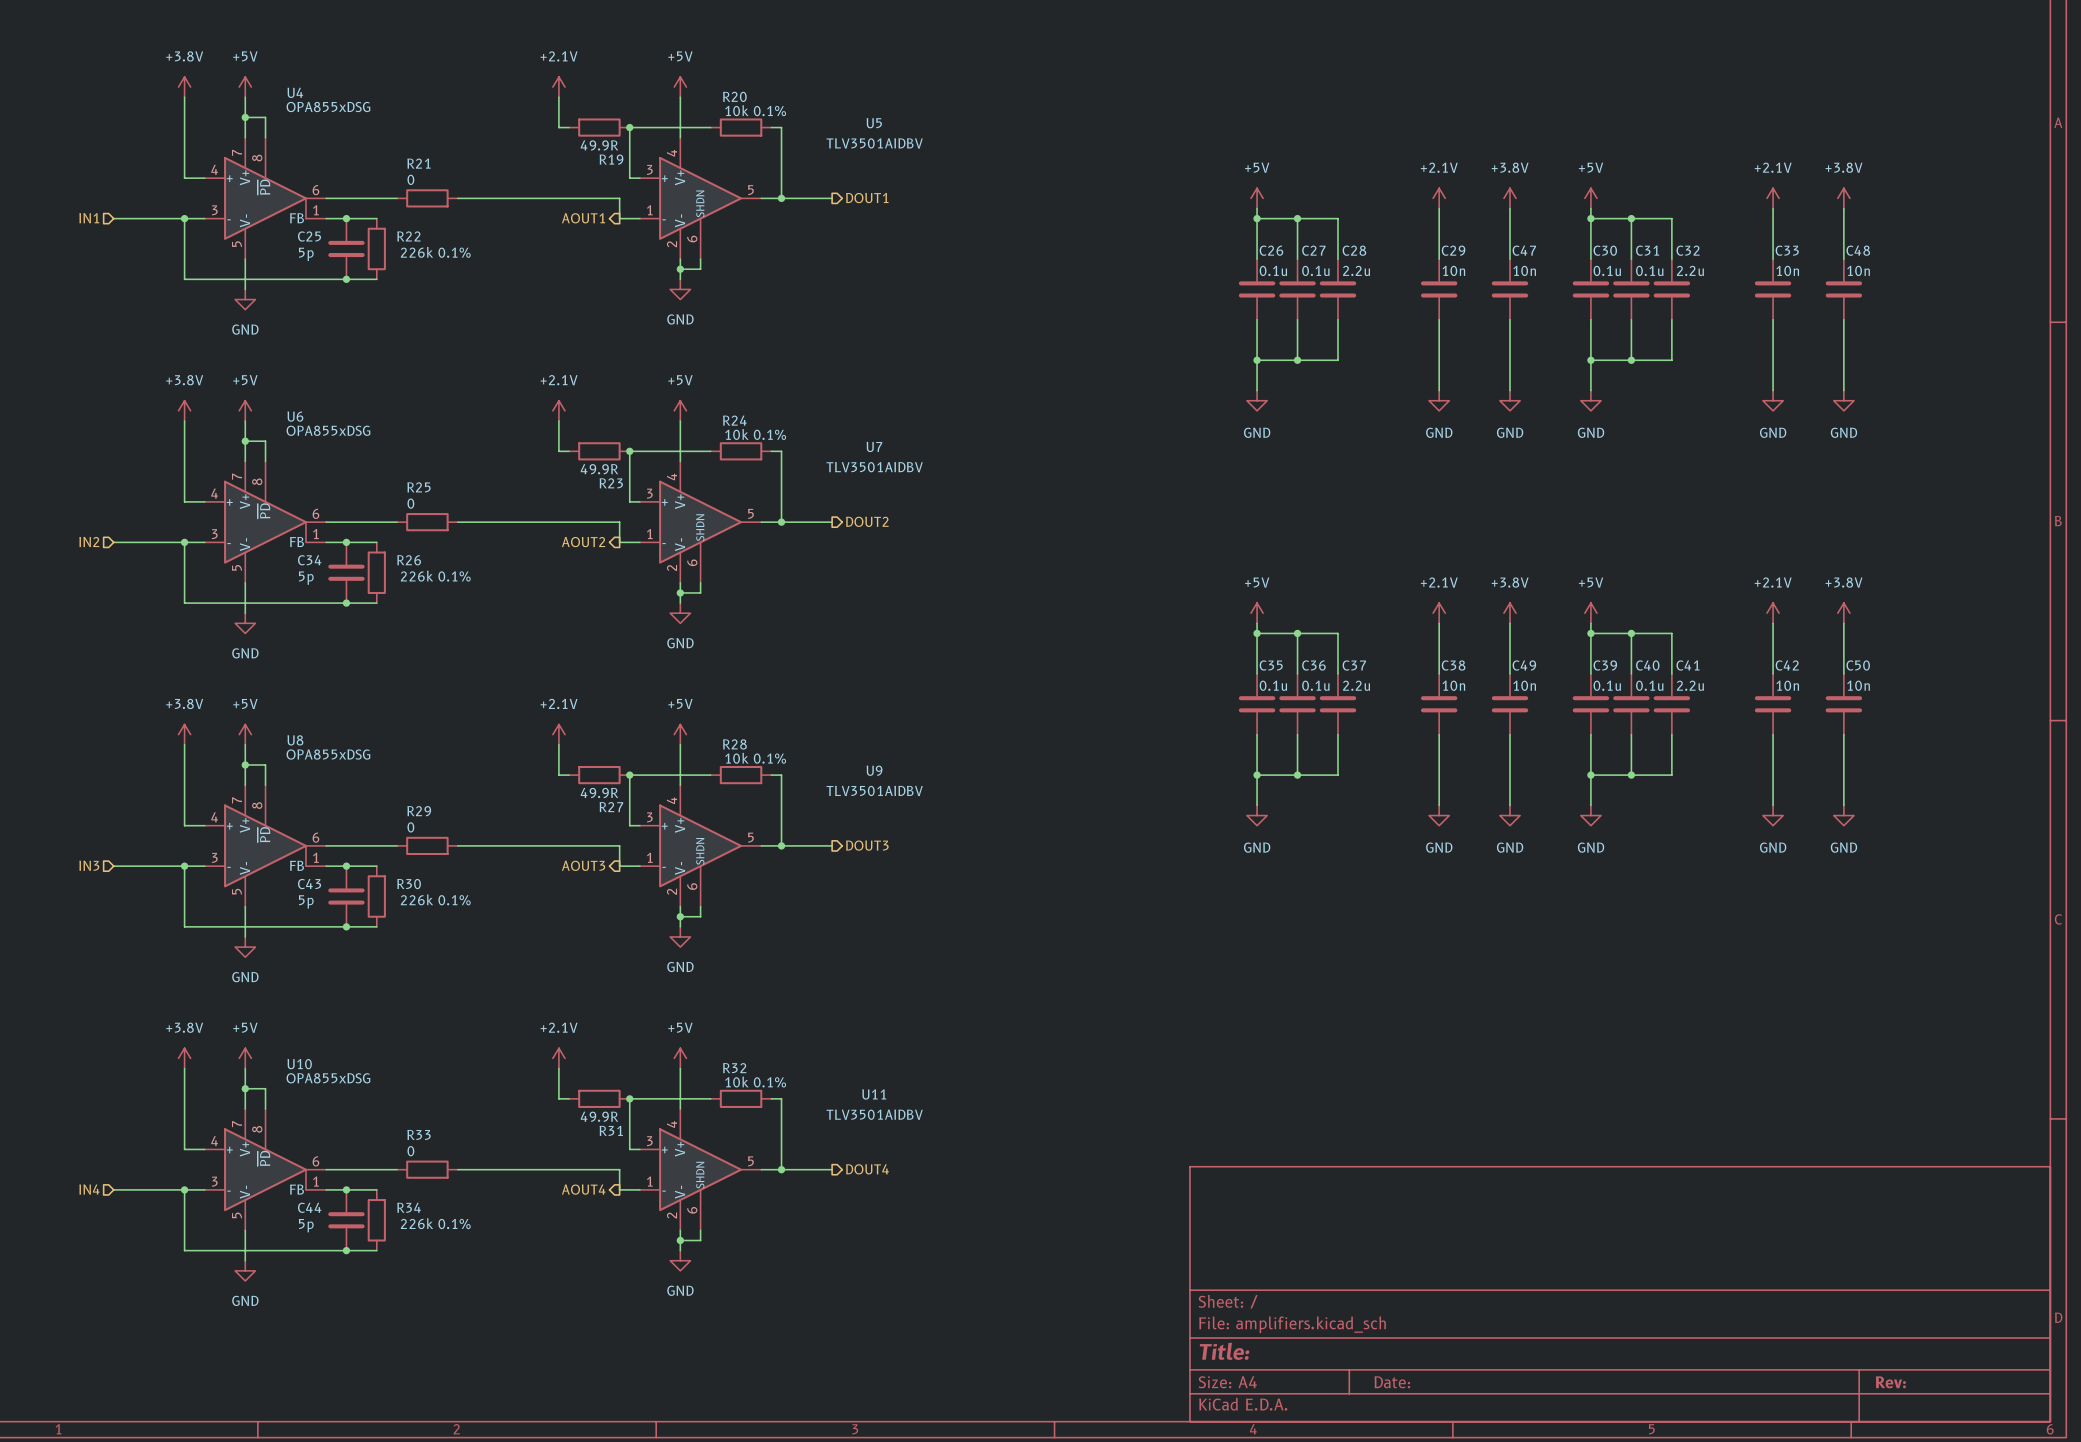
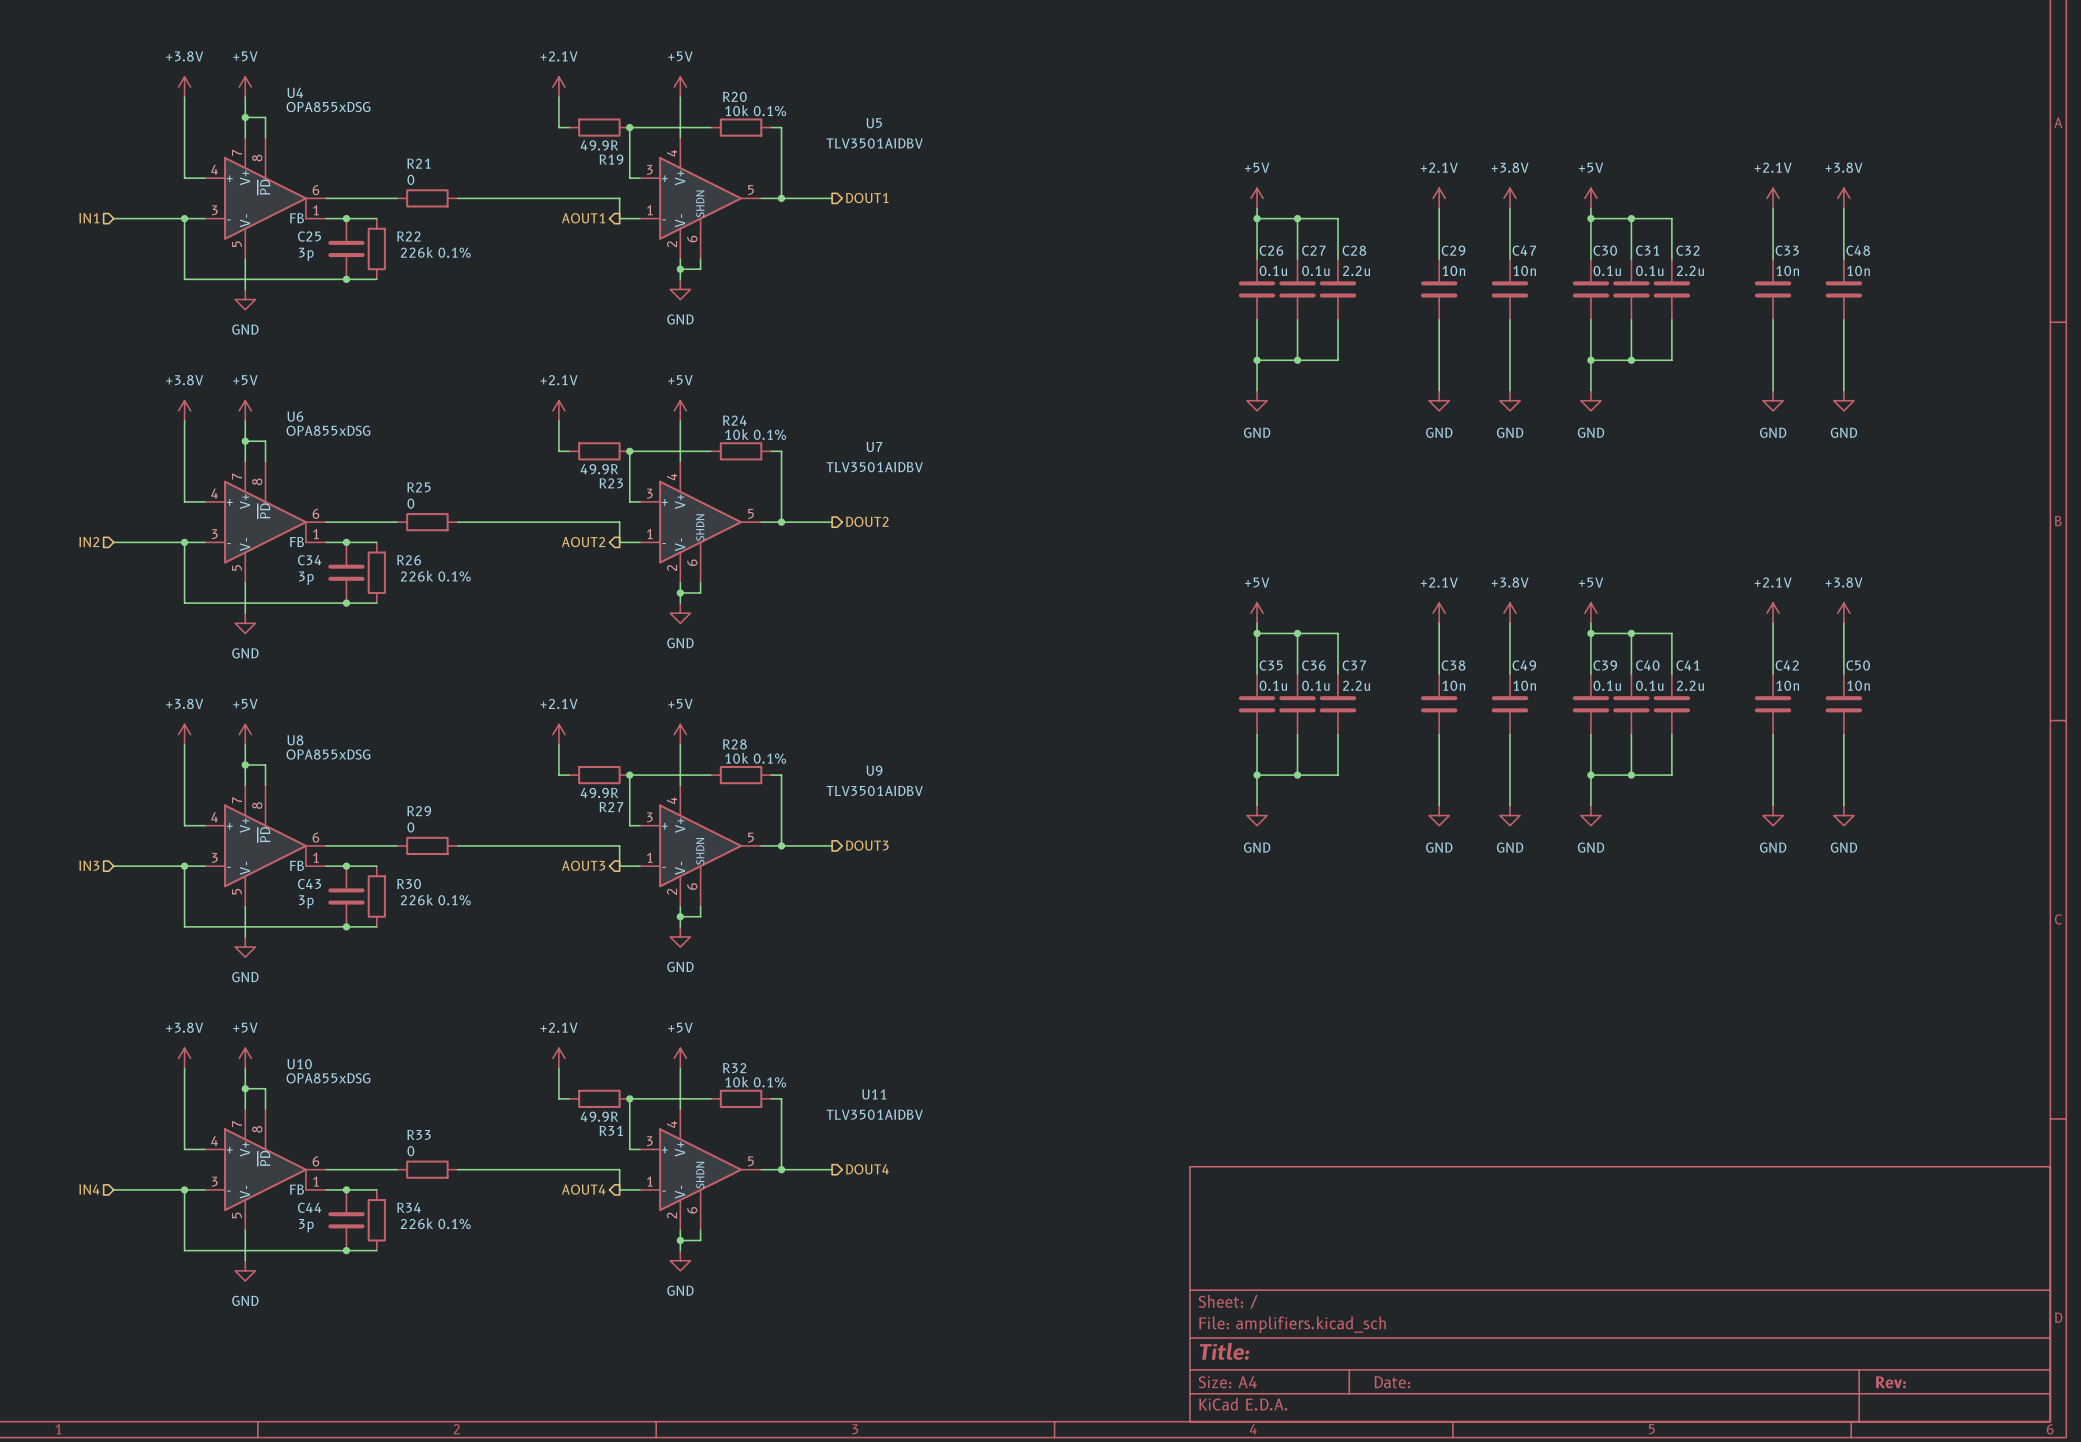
C25 value: 5p (306, 254) -> 3p (306, 254)
C34 value: 5p (306, 578) -> 3p (306, 578)
C43 value: 5p (306, 901) -> 3p (306, 901)
C44 value: 5p (306, 1225) -> 3p (306, 1225)

